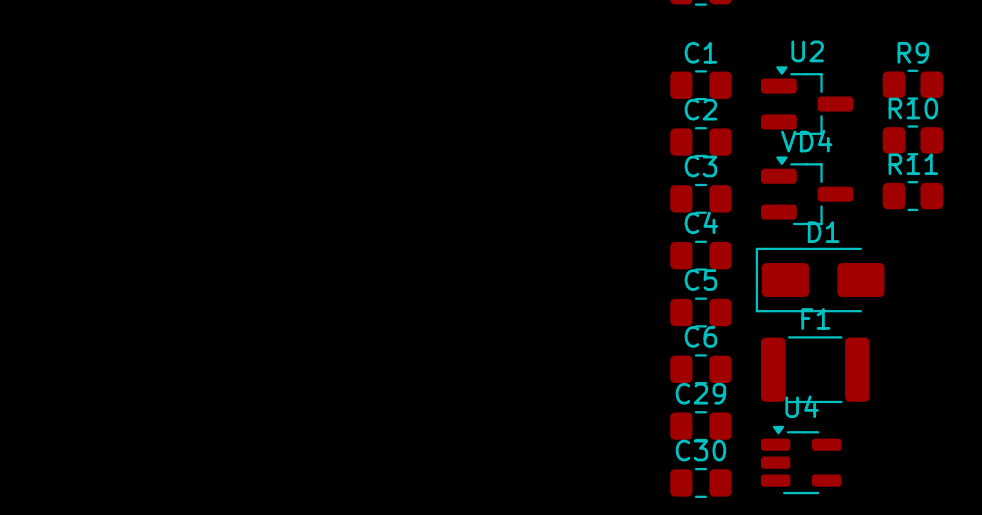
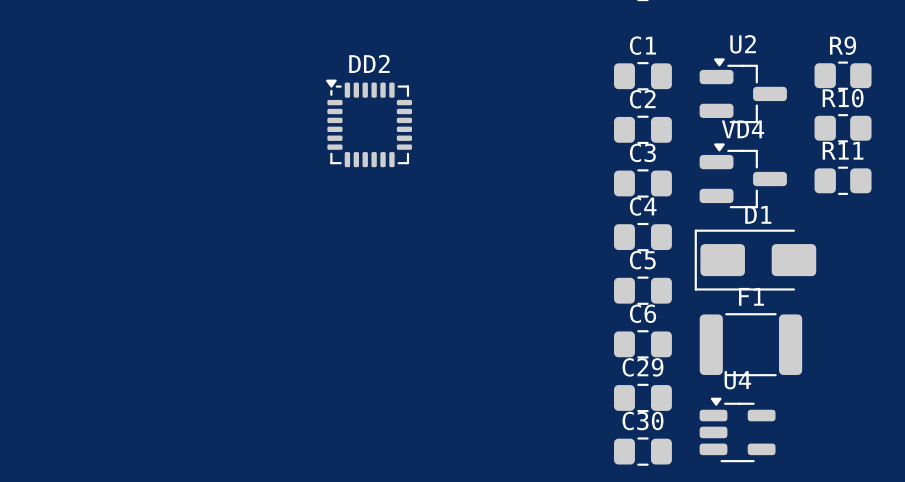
DD2: none -> (369, 123)

